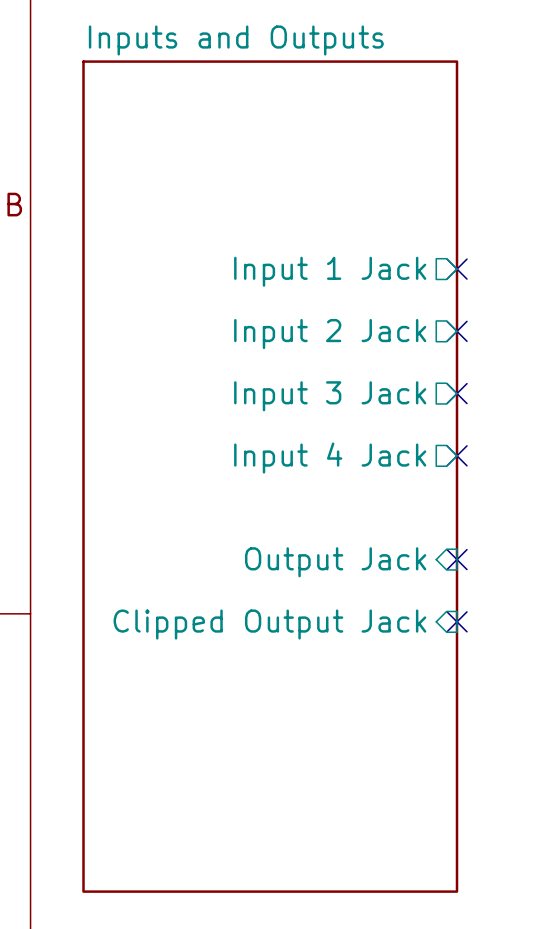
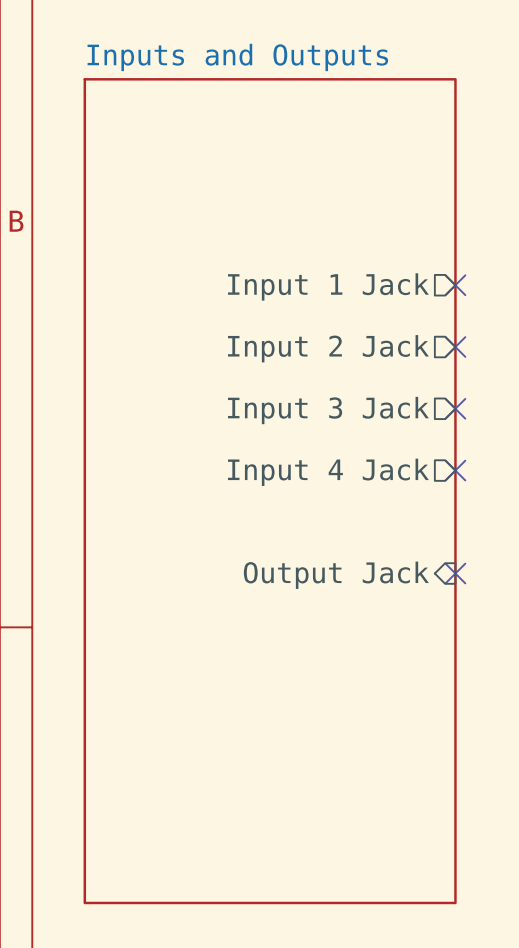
no-connect mark: (457, 621) -> none
sheet pin: Clipped Output Jack (269, 624) -> none

